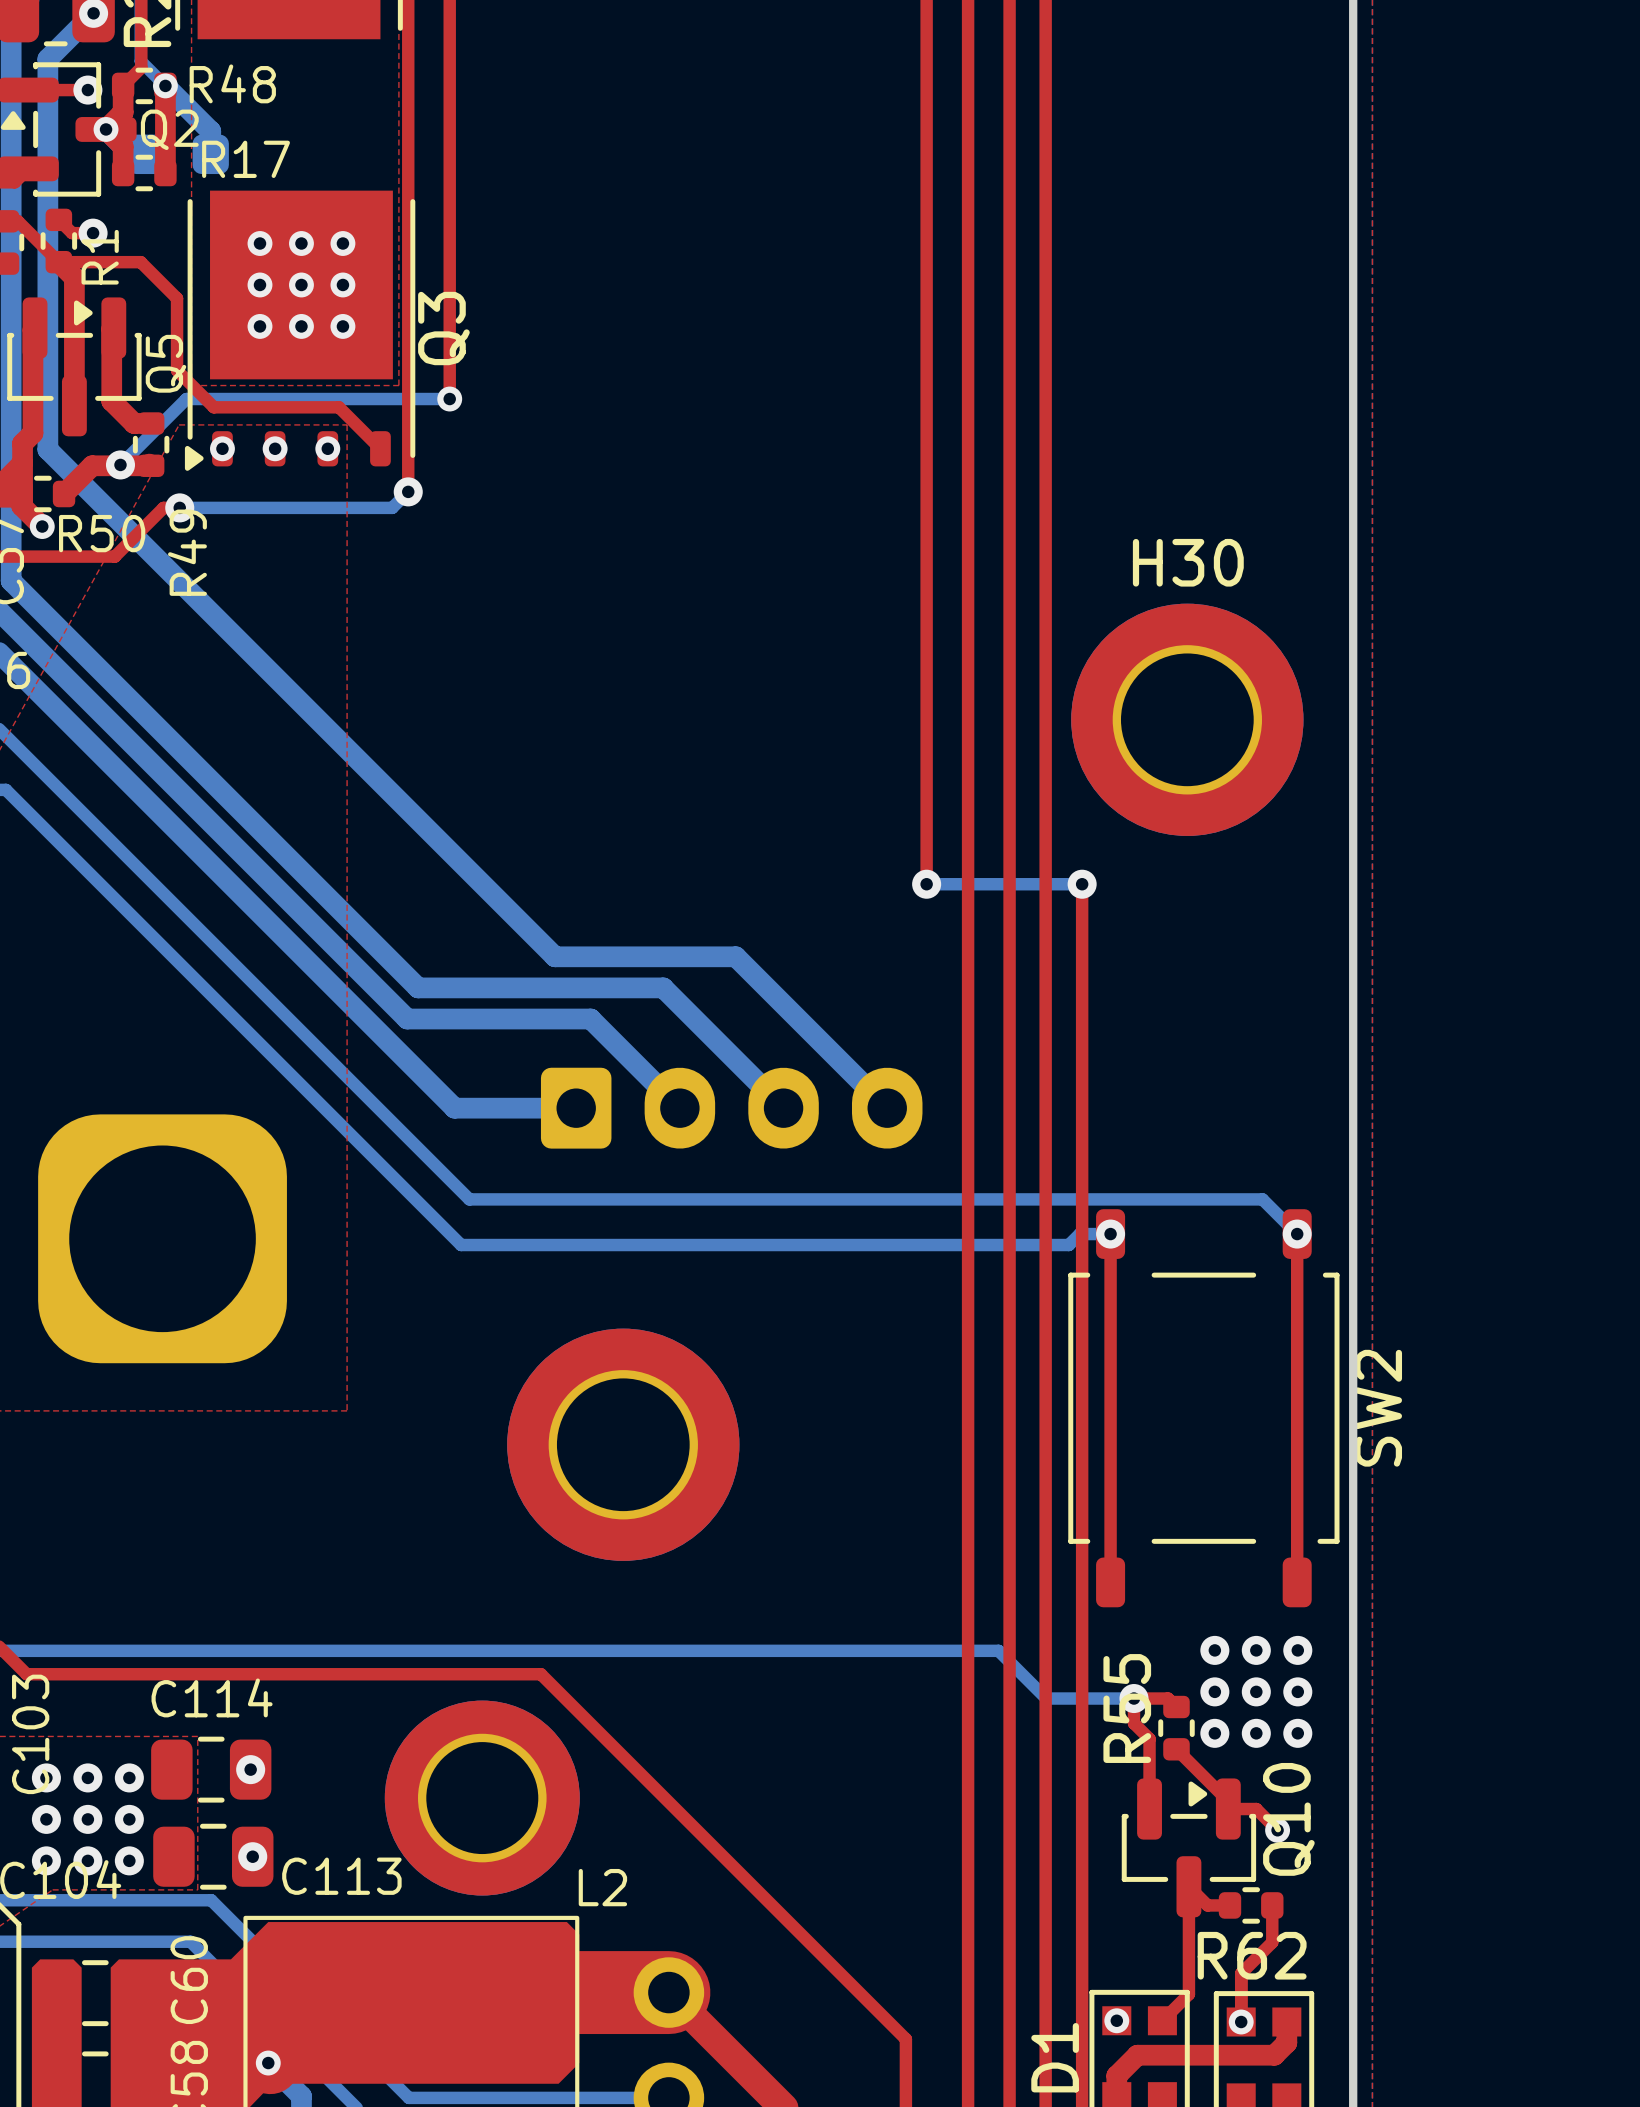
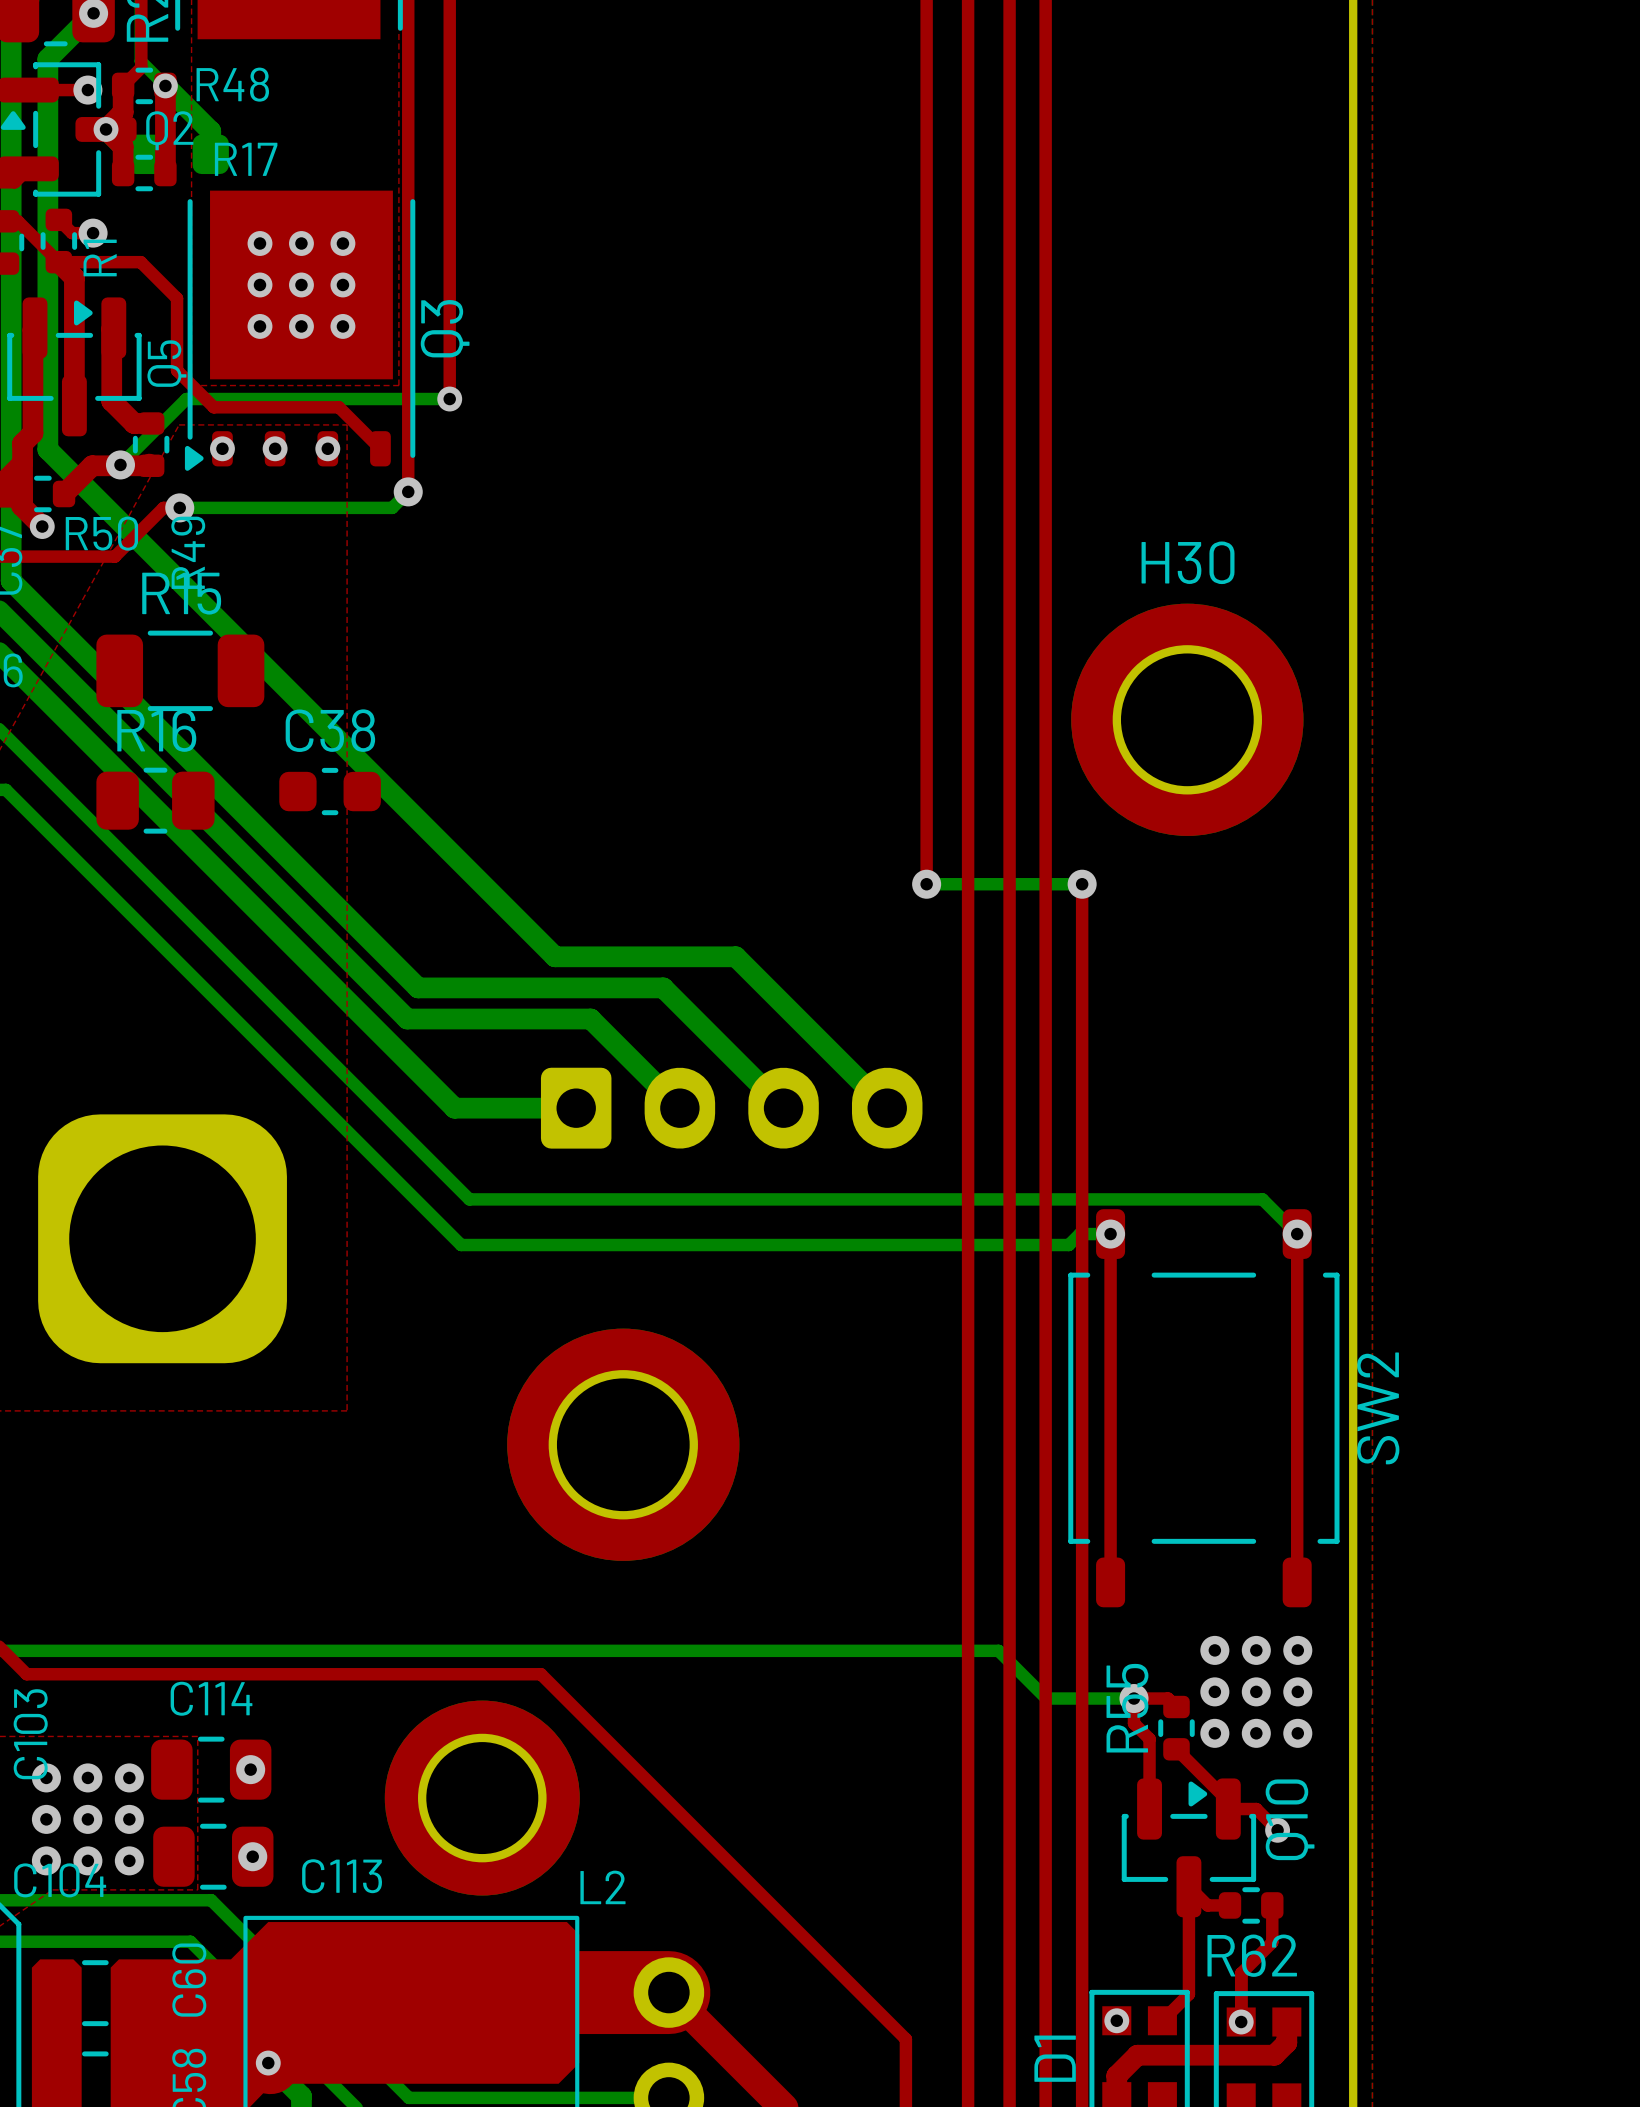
R15: none -> (180, 670)
C38: none -> (330, 791)
R16: none -> (155, 800)

